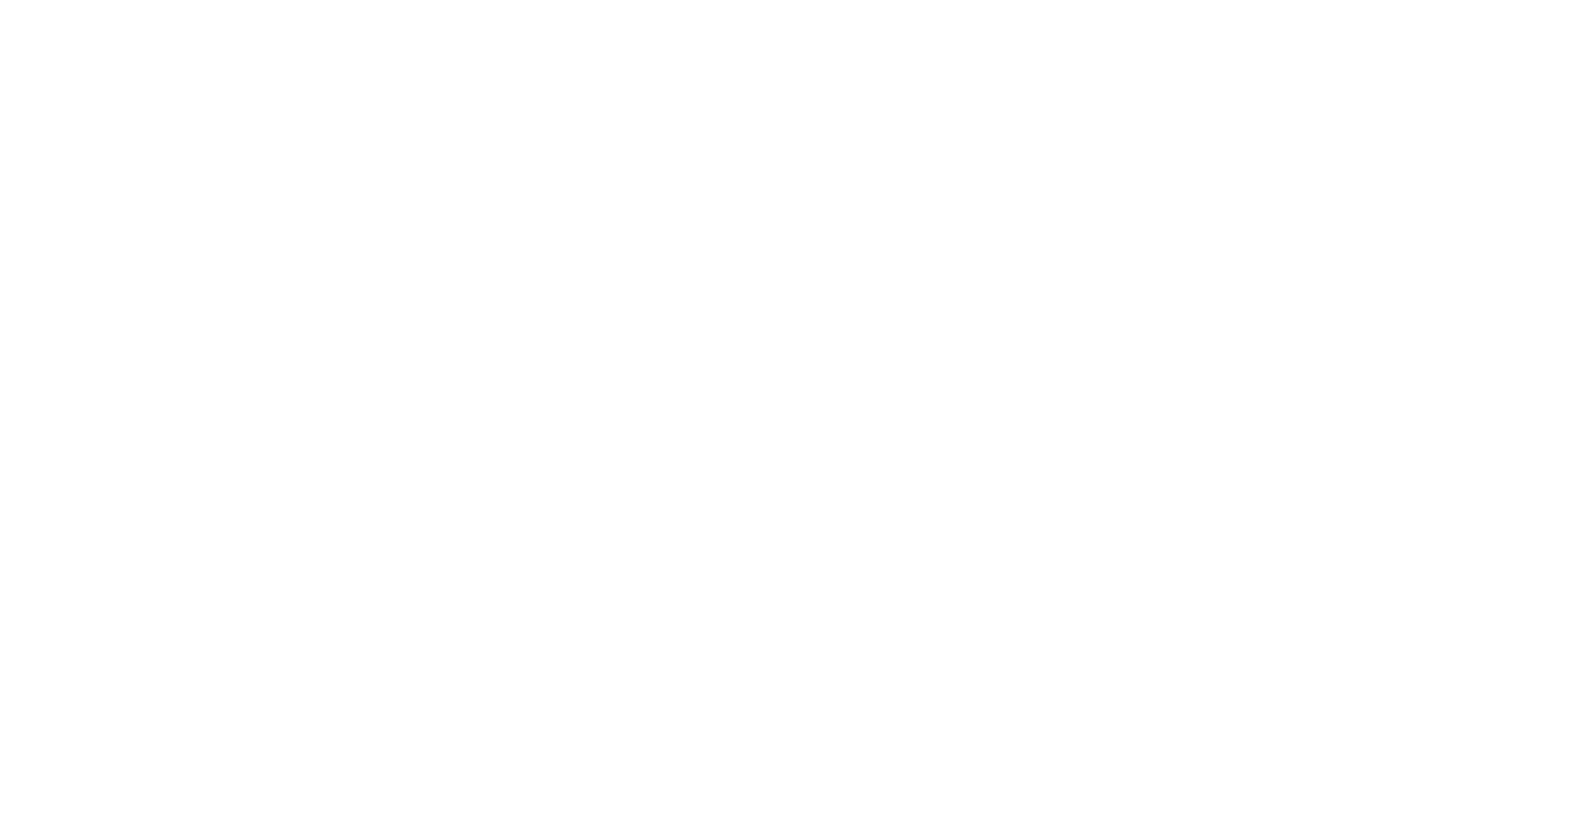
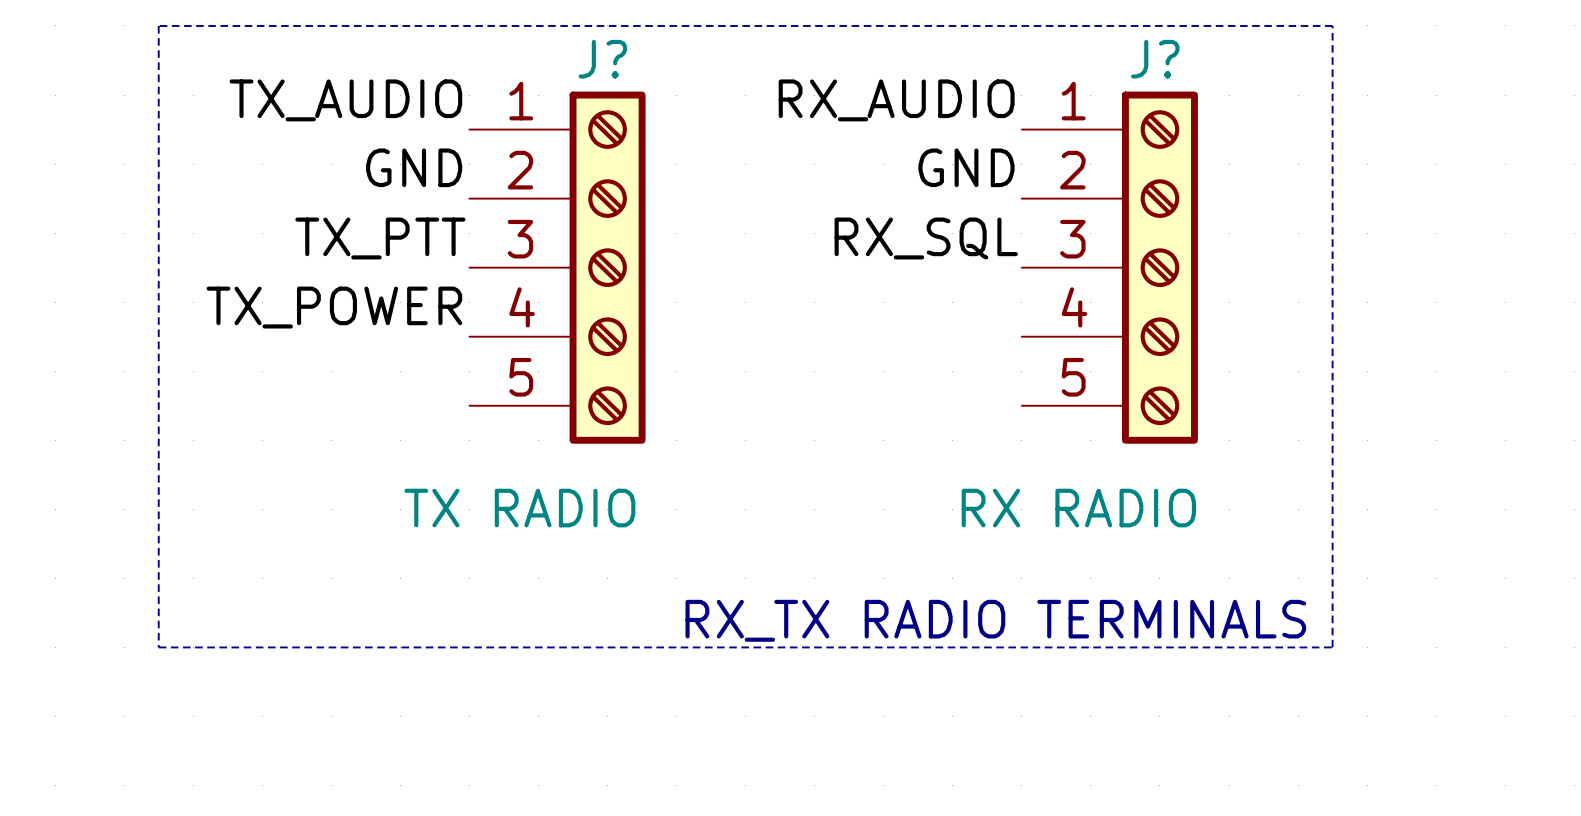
line: none -> (158, 25) (1332, 25) (1332, 647) (158, 647) (158, 25)
label: none -> TX_AUDIO (345, 100)
label: none -> RX_AUDIO (896, 100)
label: none -> GND (414, 167)
label: none -> GND (966, 167)
label: none -> TX_PTT (380, 238)
label: none -> RX_SQL (926, 238)
J?: none -> TX RADIO (557, 267)
J?: none -> RX RADIO (1109, 267)
label: none -> TX_POWER (334, 307)
text: none -> RX_TX RADIO TERMINALS (995, 620)

